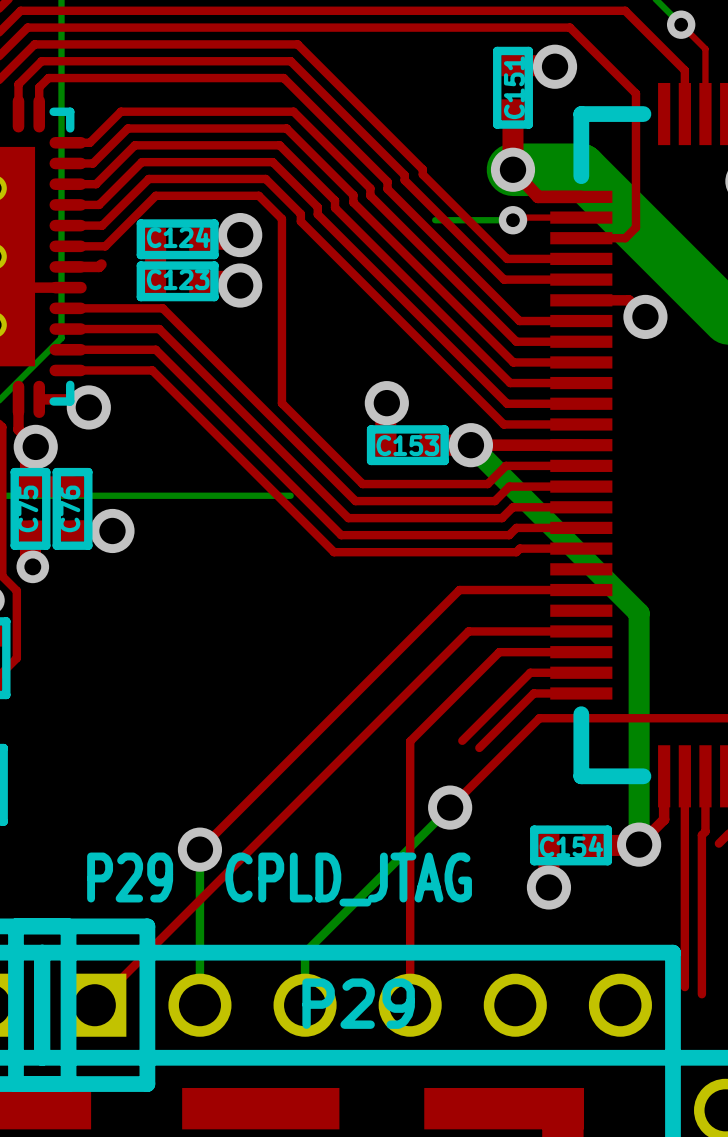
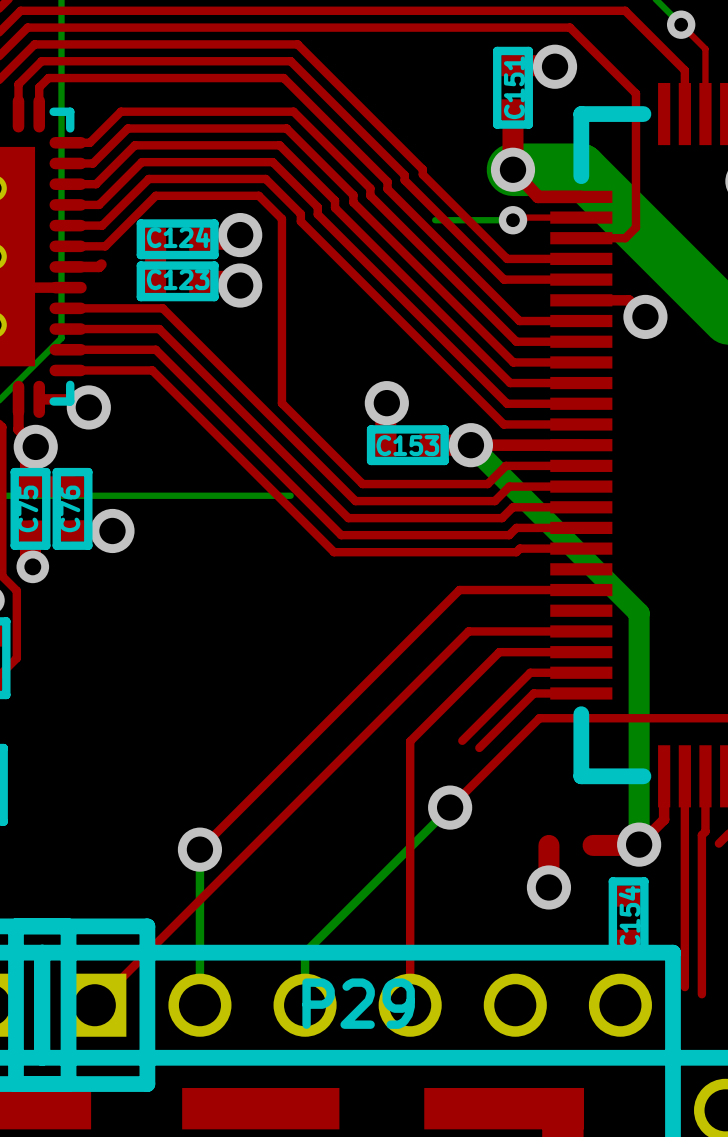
C154 rotation: 0° (571, 845) -> 90° clockwise (628, 918)
C154 position: (571, 845) -> (628, 918)
text: P29 CPLD_JTAG (279, 879) -> none

